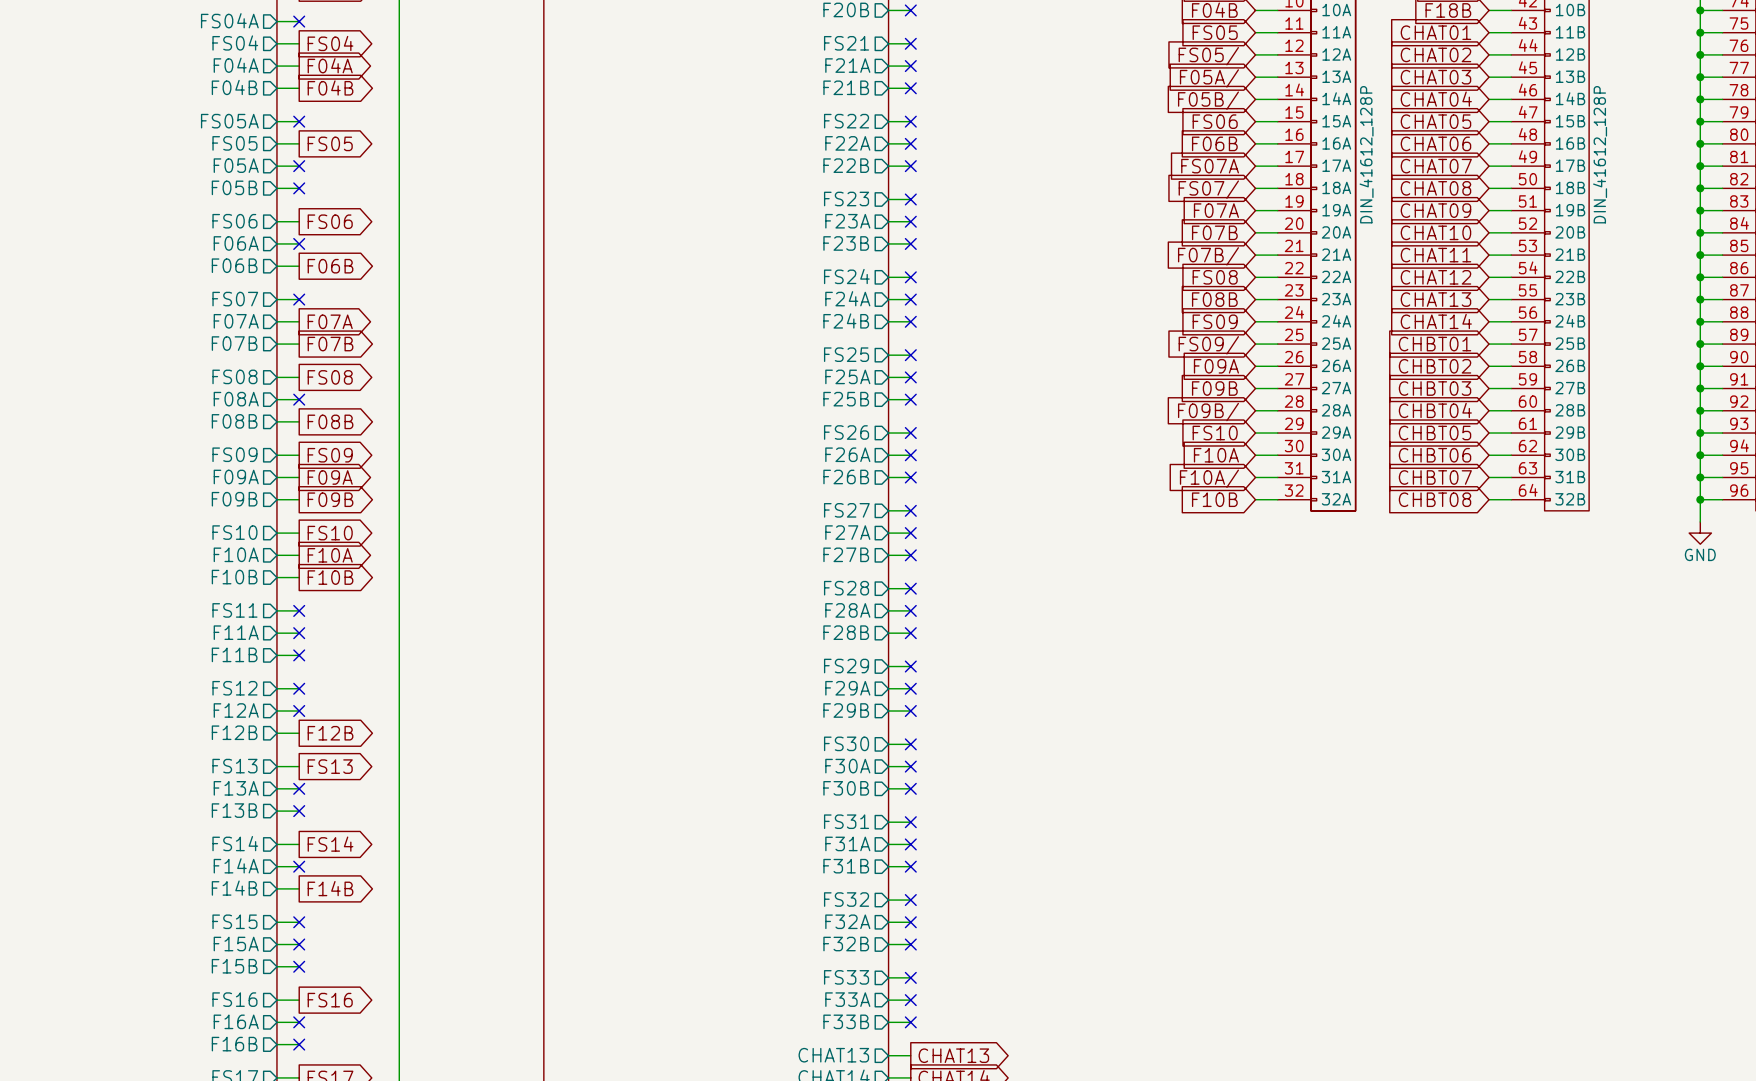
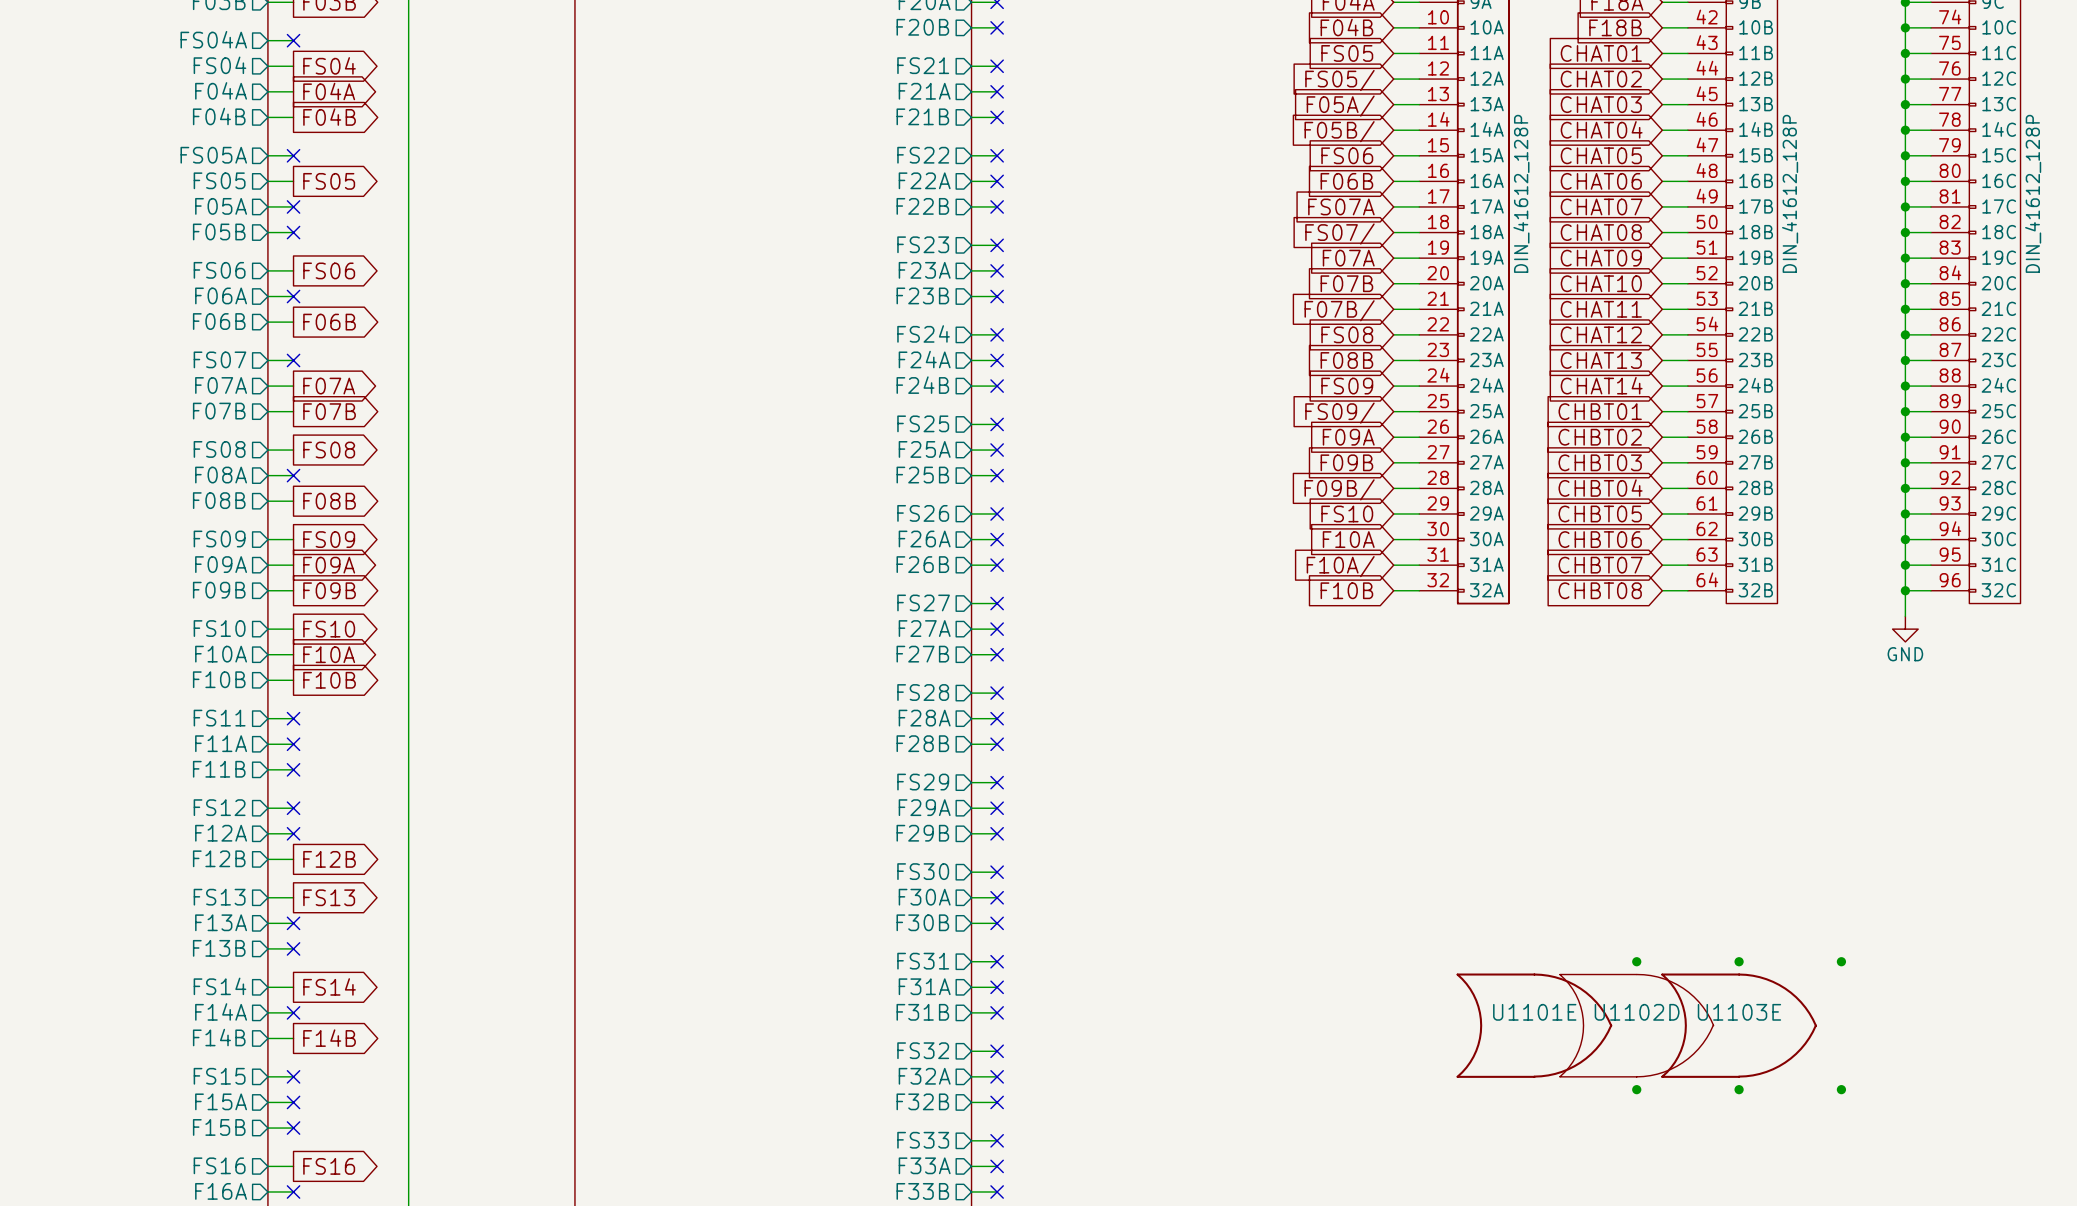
junction: none -> (1636, 961)
junction: none -> (1739, 961)
junction: none -> (1841, 961)
U1101E: none -> (1534, 1025)
U1102D: none -> (1636, 1025)
U1103E: none -> (1739, 1025)
junction: none -> (1636, 1089)
junction: none -> (1739, 1089)
junction: none -> (1841, 1089)

